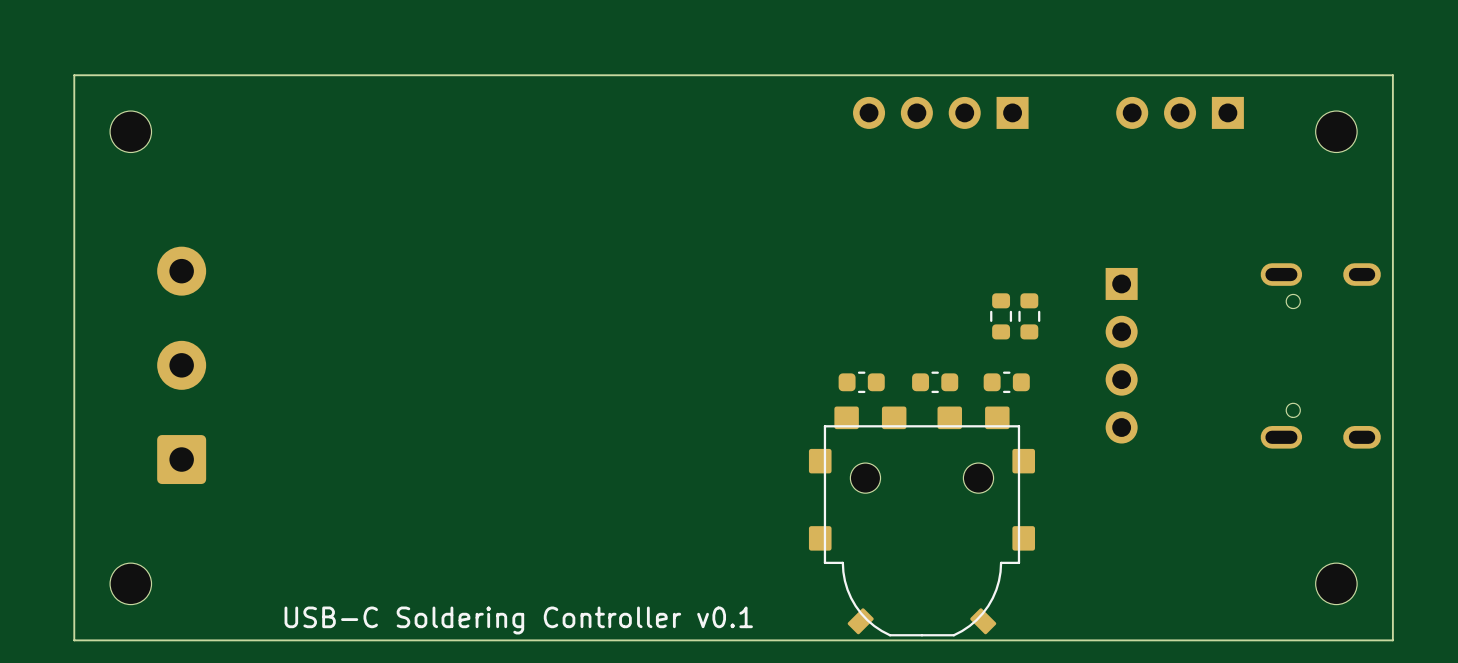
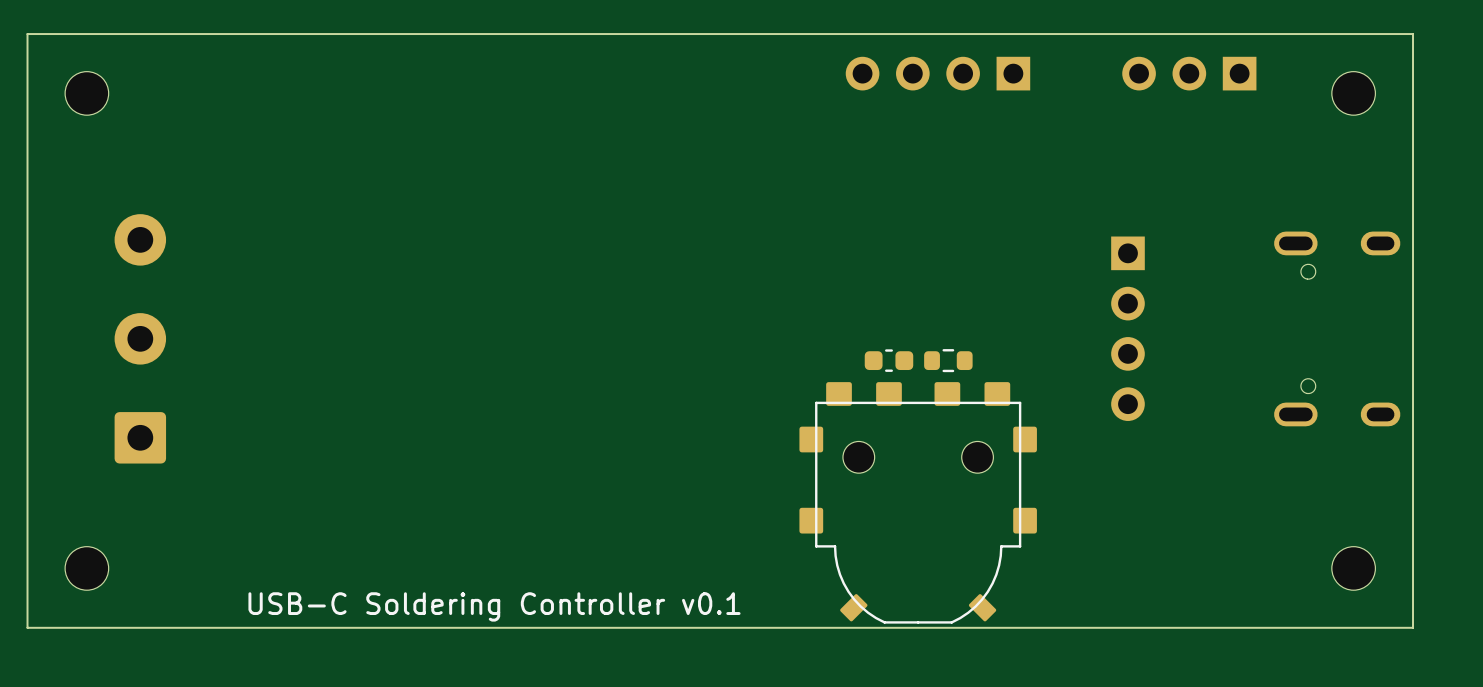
part: (1001, 316) -> none
part: (1029, 316) -> none
part footprint: [912, 371, 959, 394] -> [924, 349, 973, 373]
part position: (861, 382) -> (888, 360)
part: (1006, 382) -> none

